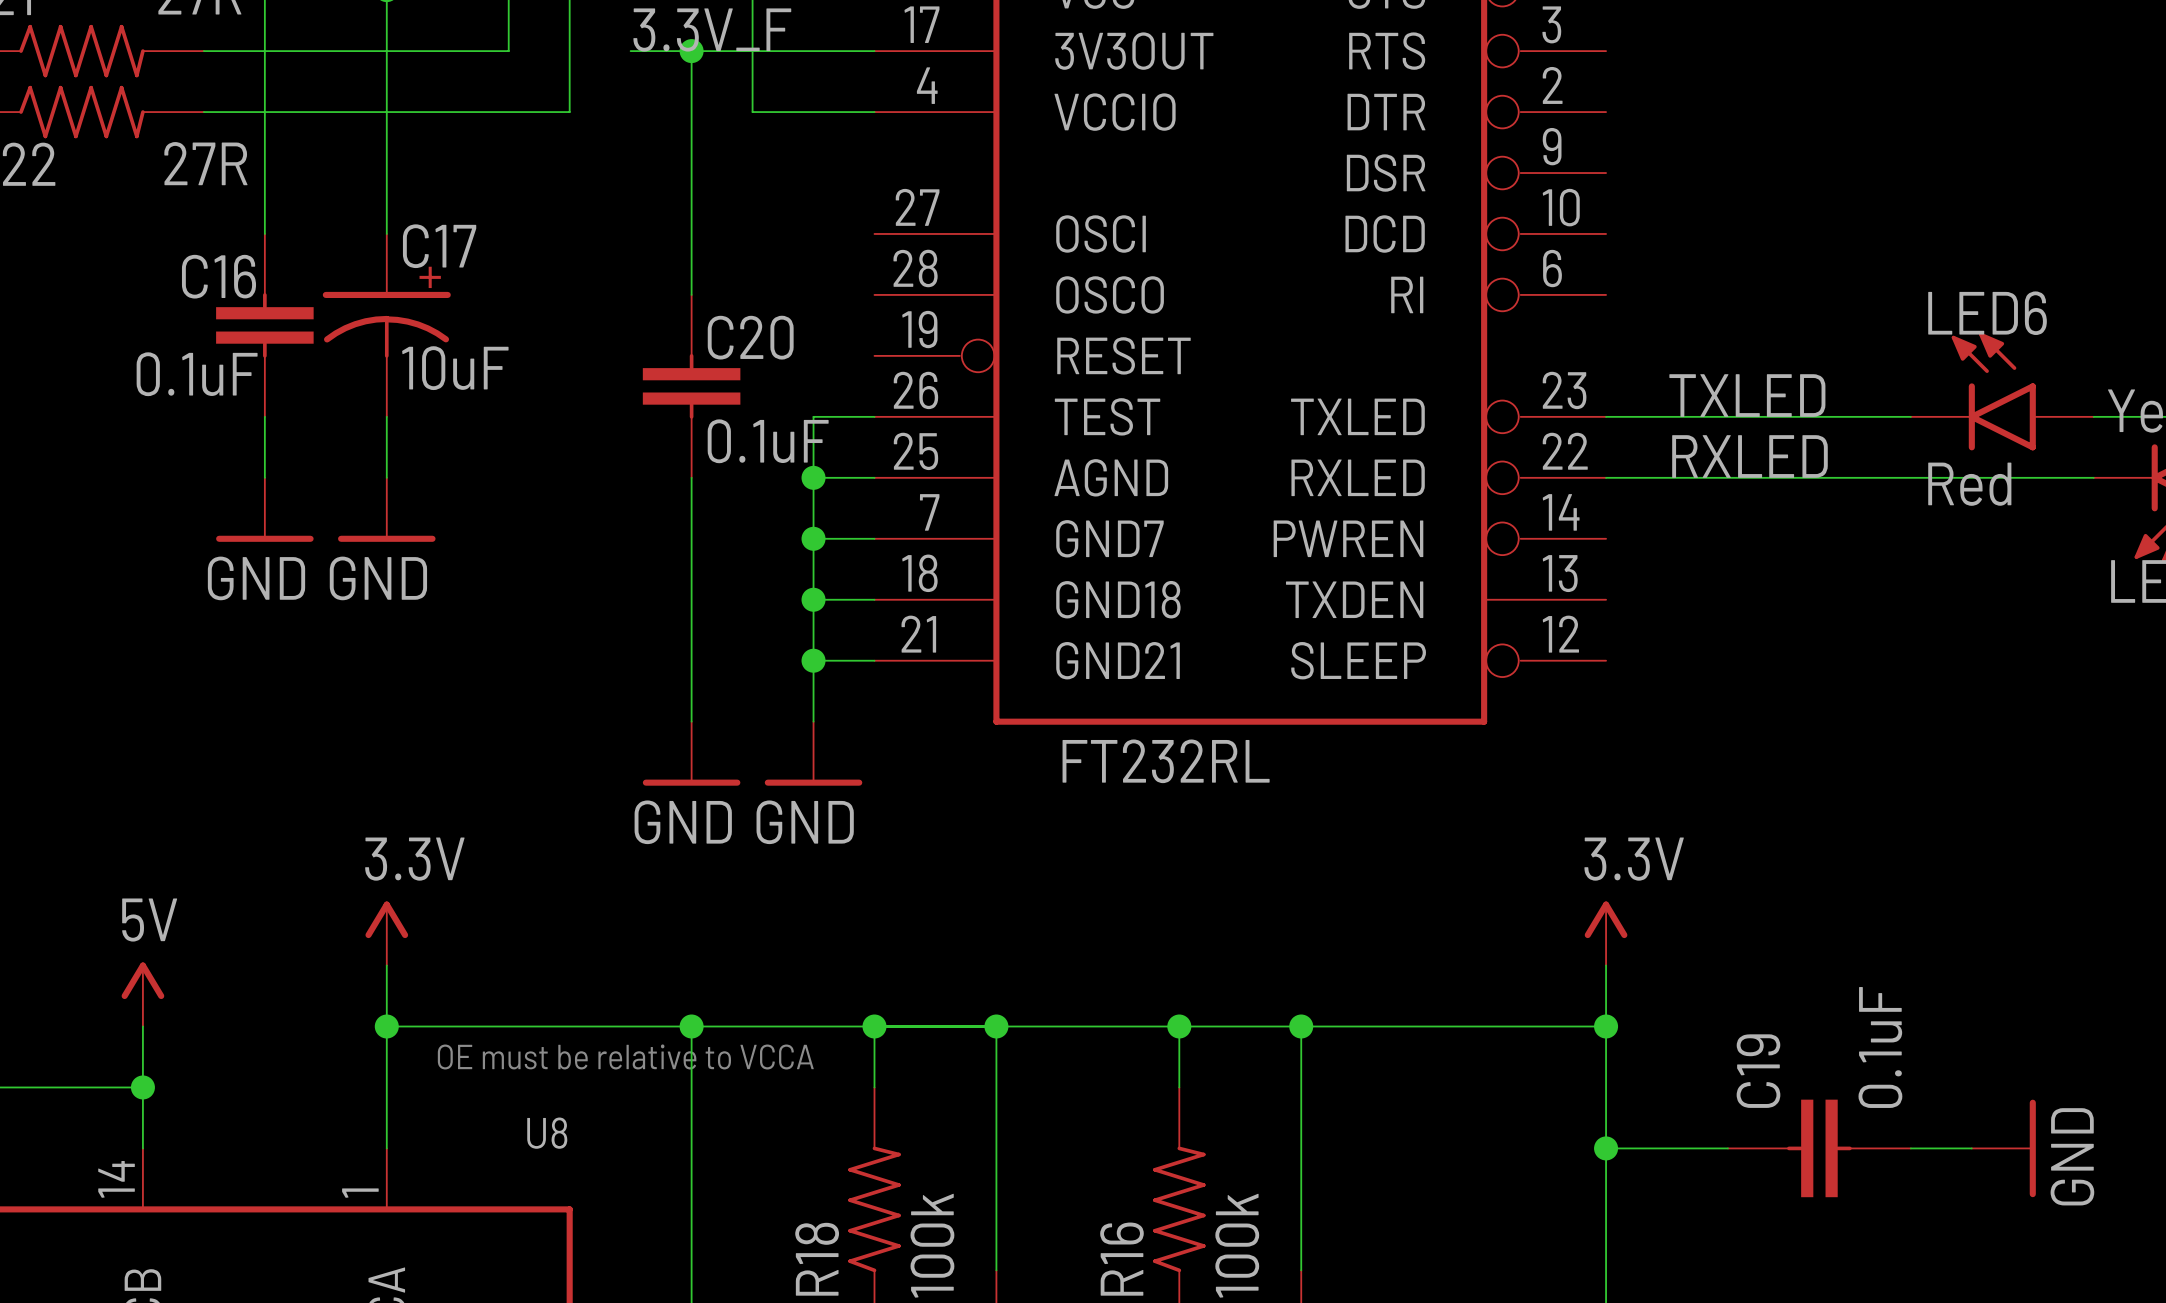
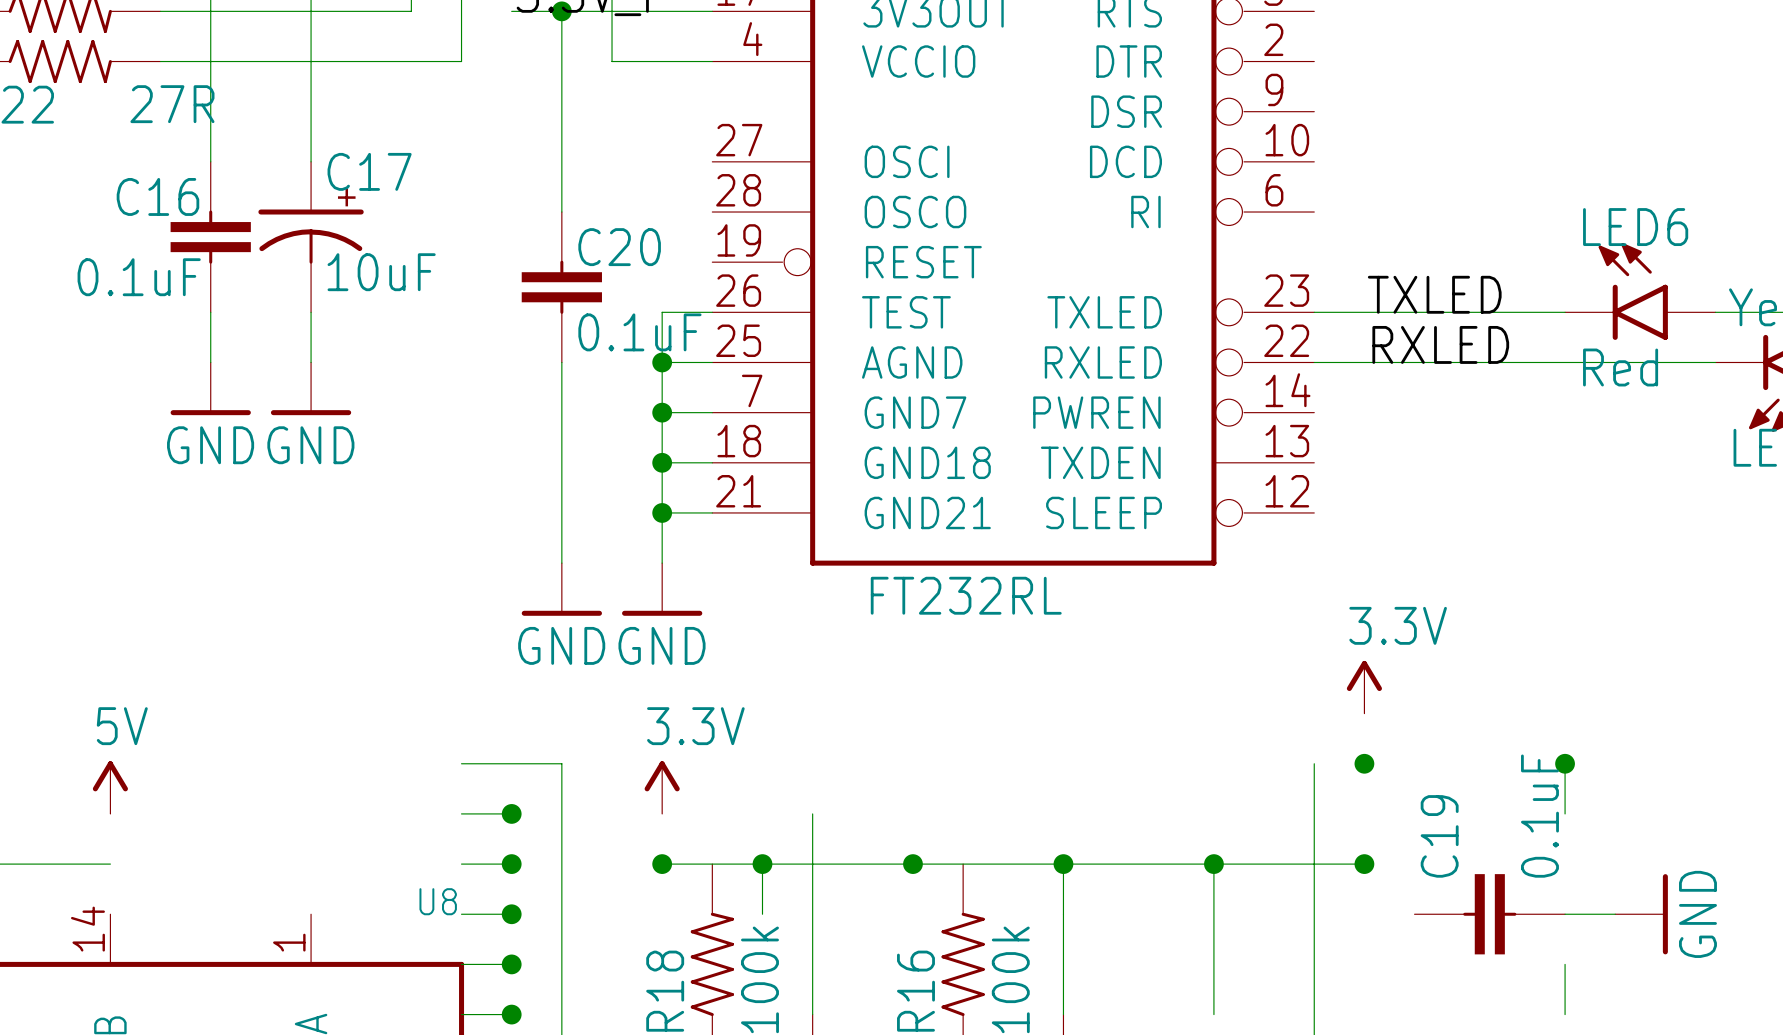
power symbol: 3.3V (386, 933) -> none
power symbol position: 3.3V (1606, 933) -> 3.3V (1364, 687)
wire: (386, 965) (386, 1148) -> none
wire: none -> (461, 763) (561, 763) (561, 813)
junction: none -> (1364, 763)
wire: none -> (1565, 763) (1565, 813)
junction: none -> (1565, 763)
power symbol: none -> 3.3V (662, 787)
wire: (142, 1026) (142, 1148) -> none
wire: (386, 1026) (569, 1026) -> none
junction: (386, 1026) -> none
wire: (630, 1026) (1606, 1026) -> none
junction: none -> (511, 813)
junction: (691, 1026) -> none
wire: (874, 1026) (874, 1087) -> (762, 864) (762, 914)
junction: (874, 1026) -> none
junction: (996, 1026) -> none
wire: (1179, 1026) (1179, 1087) -> none
junction: (1179, 1026) -> none
wire: (1301, 1026) (1301, 1087) -> none
junction position: (1301, 1026) -> (1063, 864)
junction: (1606, 1026) -> none
text: OE must be relative to VCCA (625, 1056) -> none
junction: (142, 1087) -> none
wire: none -> (461, 864) (511, 864)
junction: none -> (511, 864)
wire: none -> (662, 864) (1364, 864)
junction: none -> (662, 864)
junction: none -> (762, 864)
junction: none -> (912, 864)
wire: none -> (1213, 864) (1213, 1014)
junction: none -> (1213, 864)
junction: none -> (1364, 864)
wire: none -> (461, 914) (511, 914)
junction: none -> (511, 914)
wire: (1606, 1148) (1727, 1148) -> none
junction: (1606, 1148) -> none
wire: none -> (461, 964) (511, 964)
junction: none -> (511, 964)
wire: none -> (1565, 964) (1565, 1014)
wire: none -> (461, 1014) (511, 1014)
junction: none -> (511, 1014)

